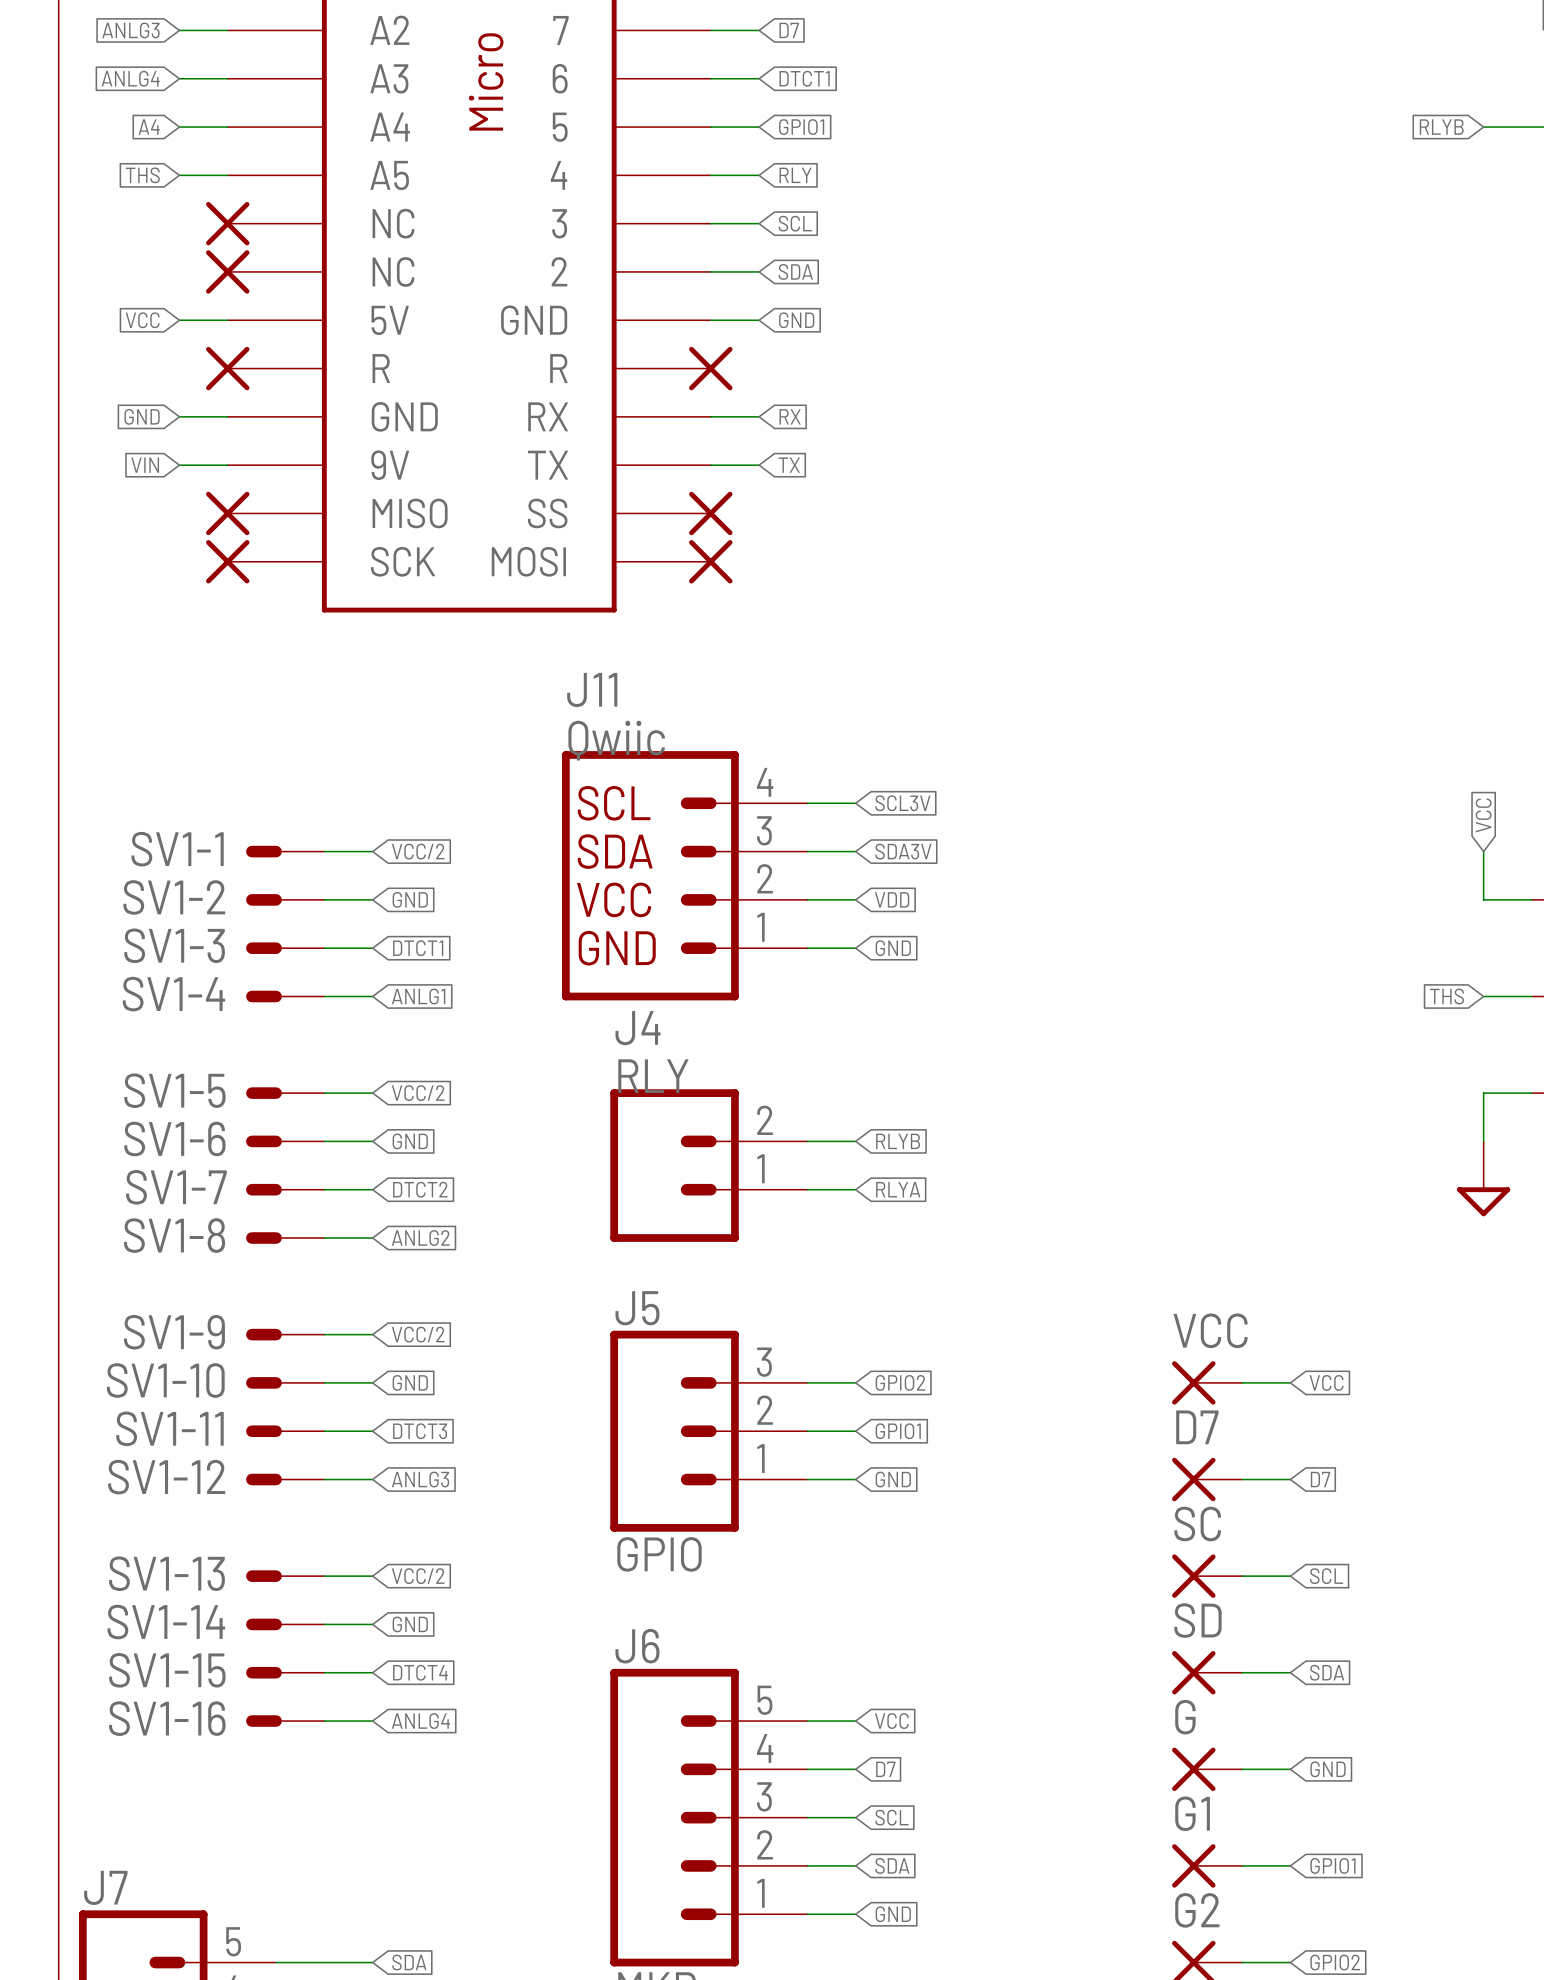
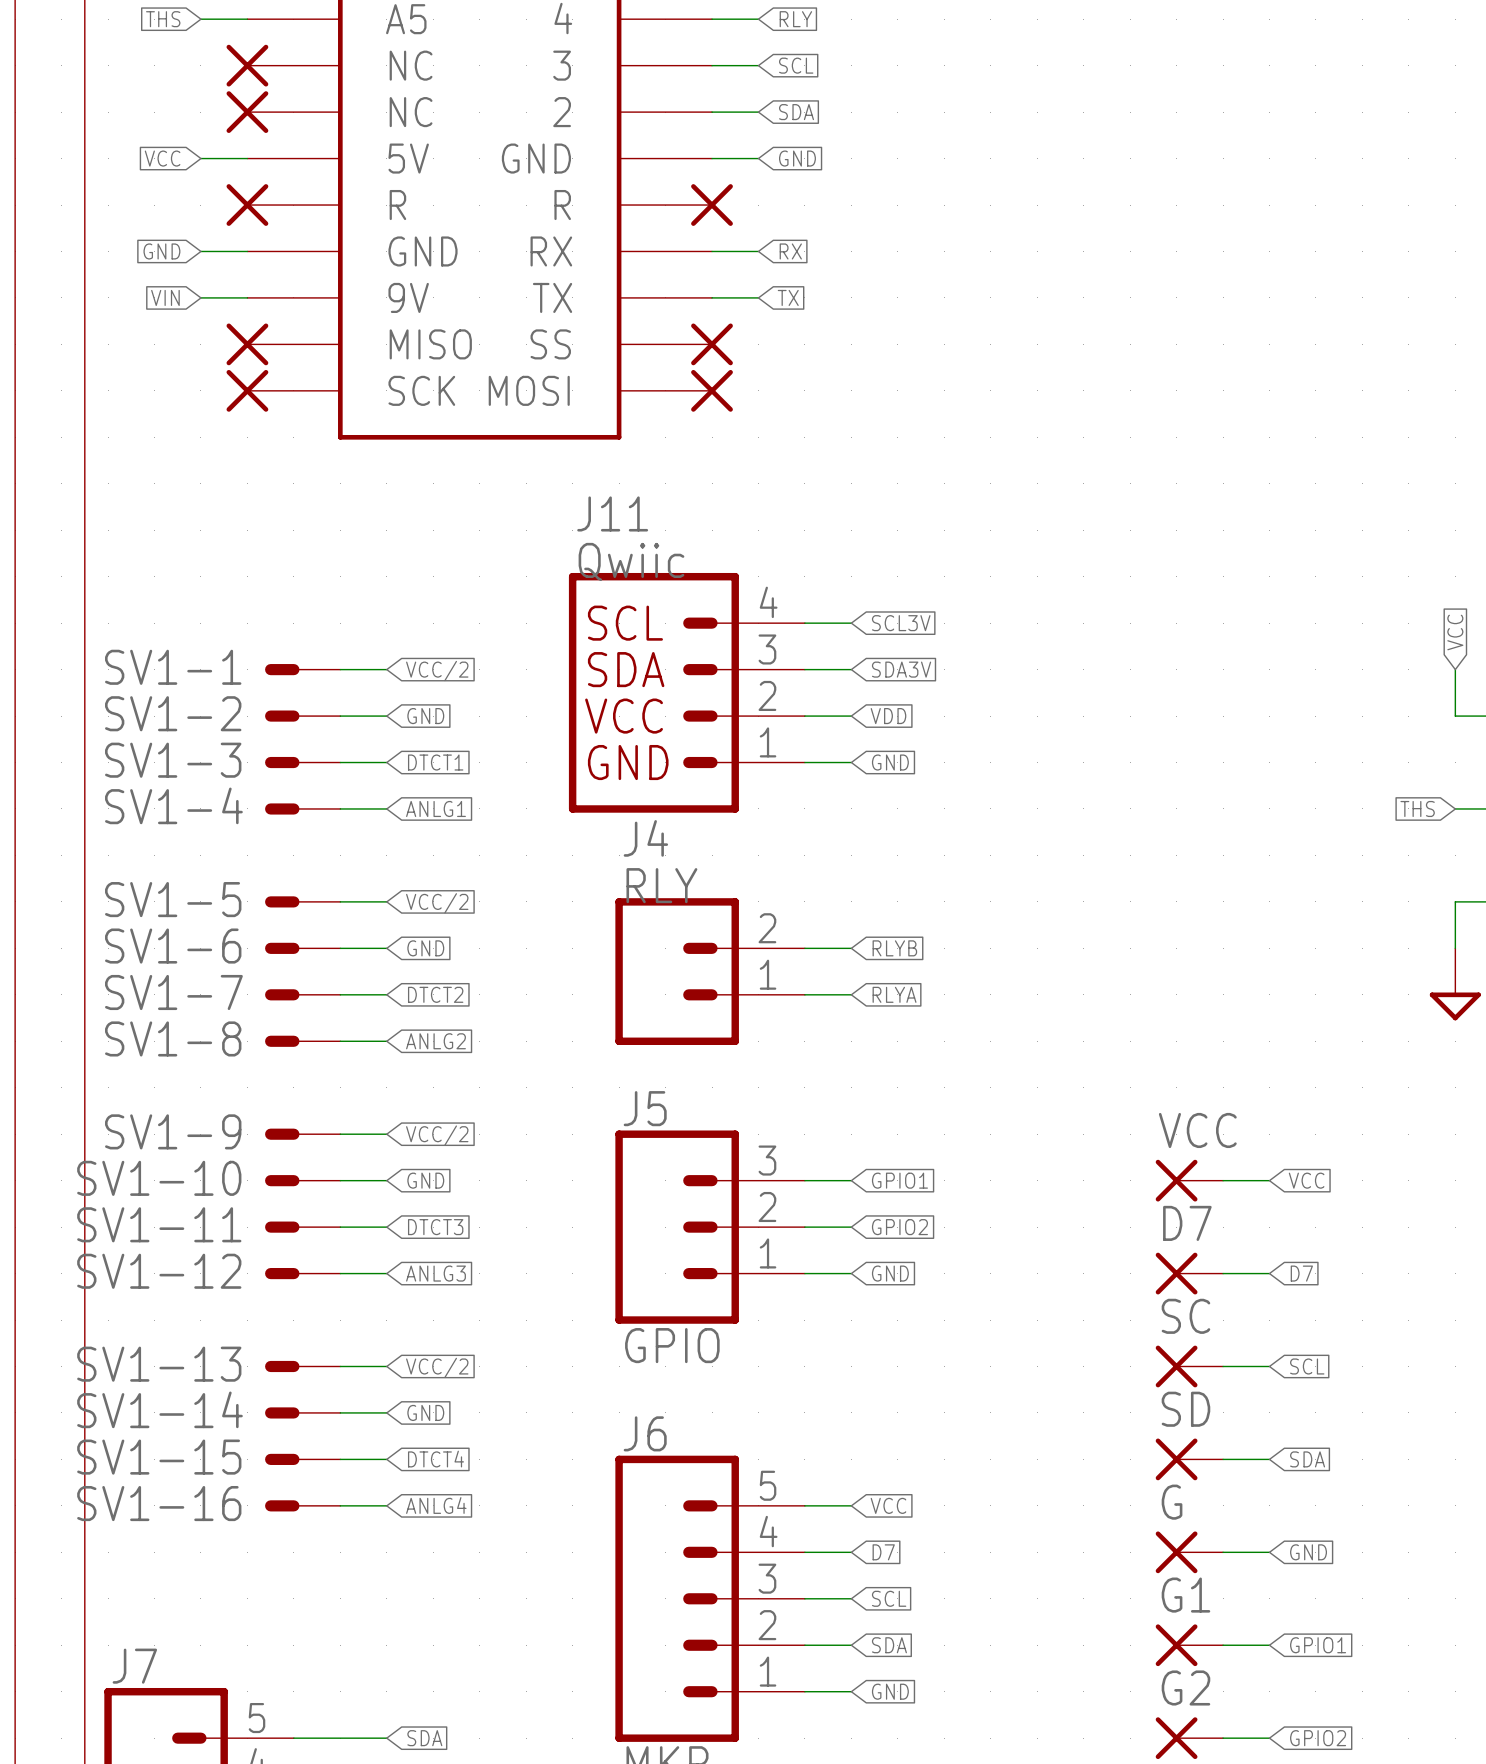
global label: GPIO2 (900, 1382) -> GPIO1 (899, 1180)
global label: GPIO1 (898, 1431) -> GPIO2 (899, 1227)

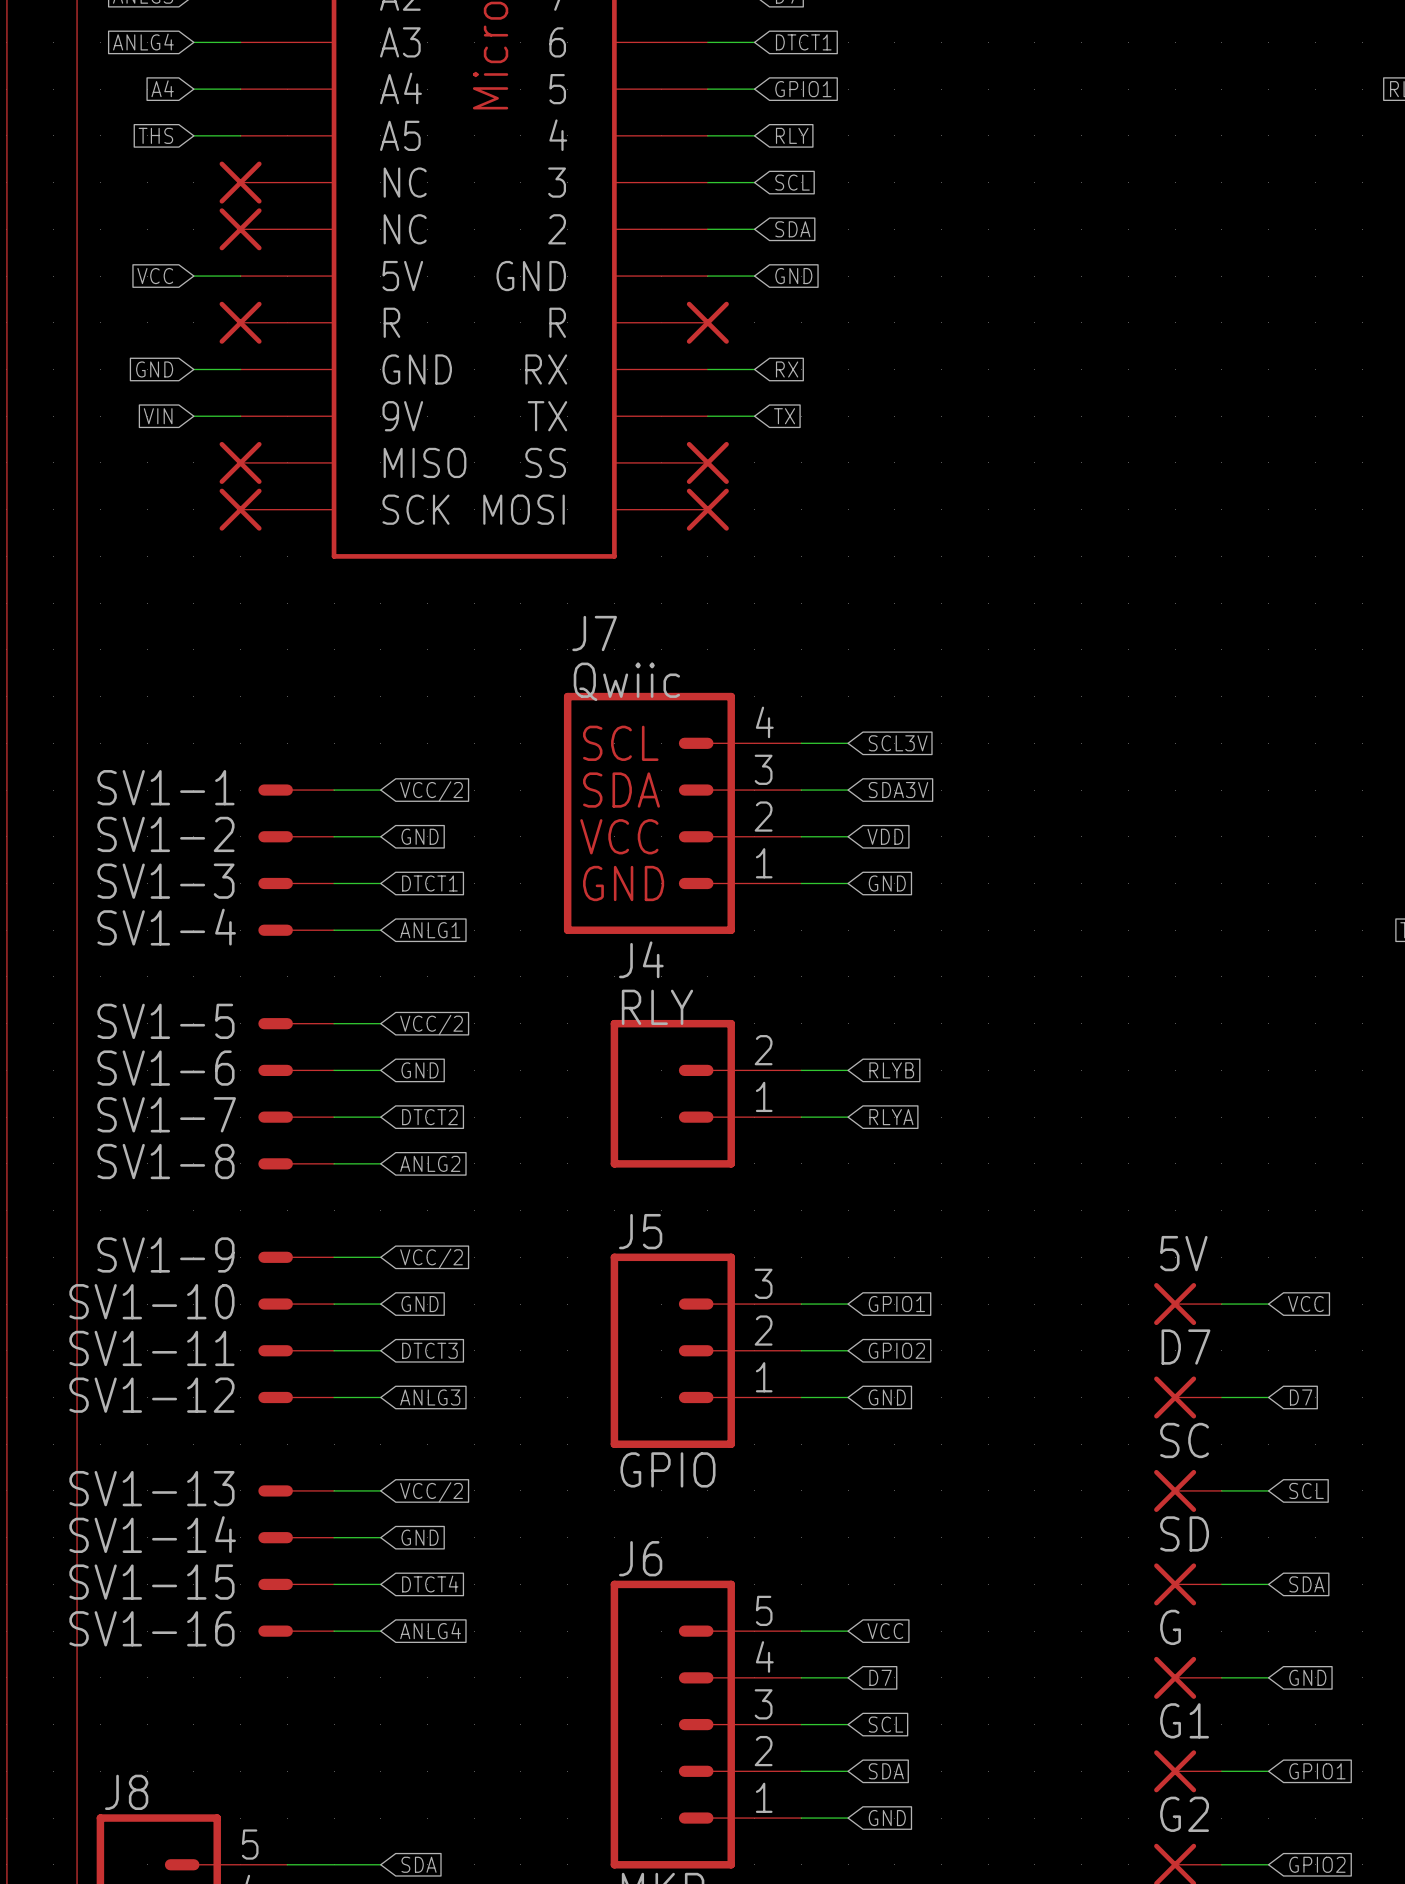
J11 name: J11 (612, 513) -> J7 (594, 633)
VCC name: VCC (1197, 1130) -> 5V (1183, 1253)
J7 name: J7 (134, 1666) -> J8 (126, 1792)

